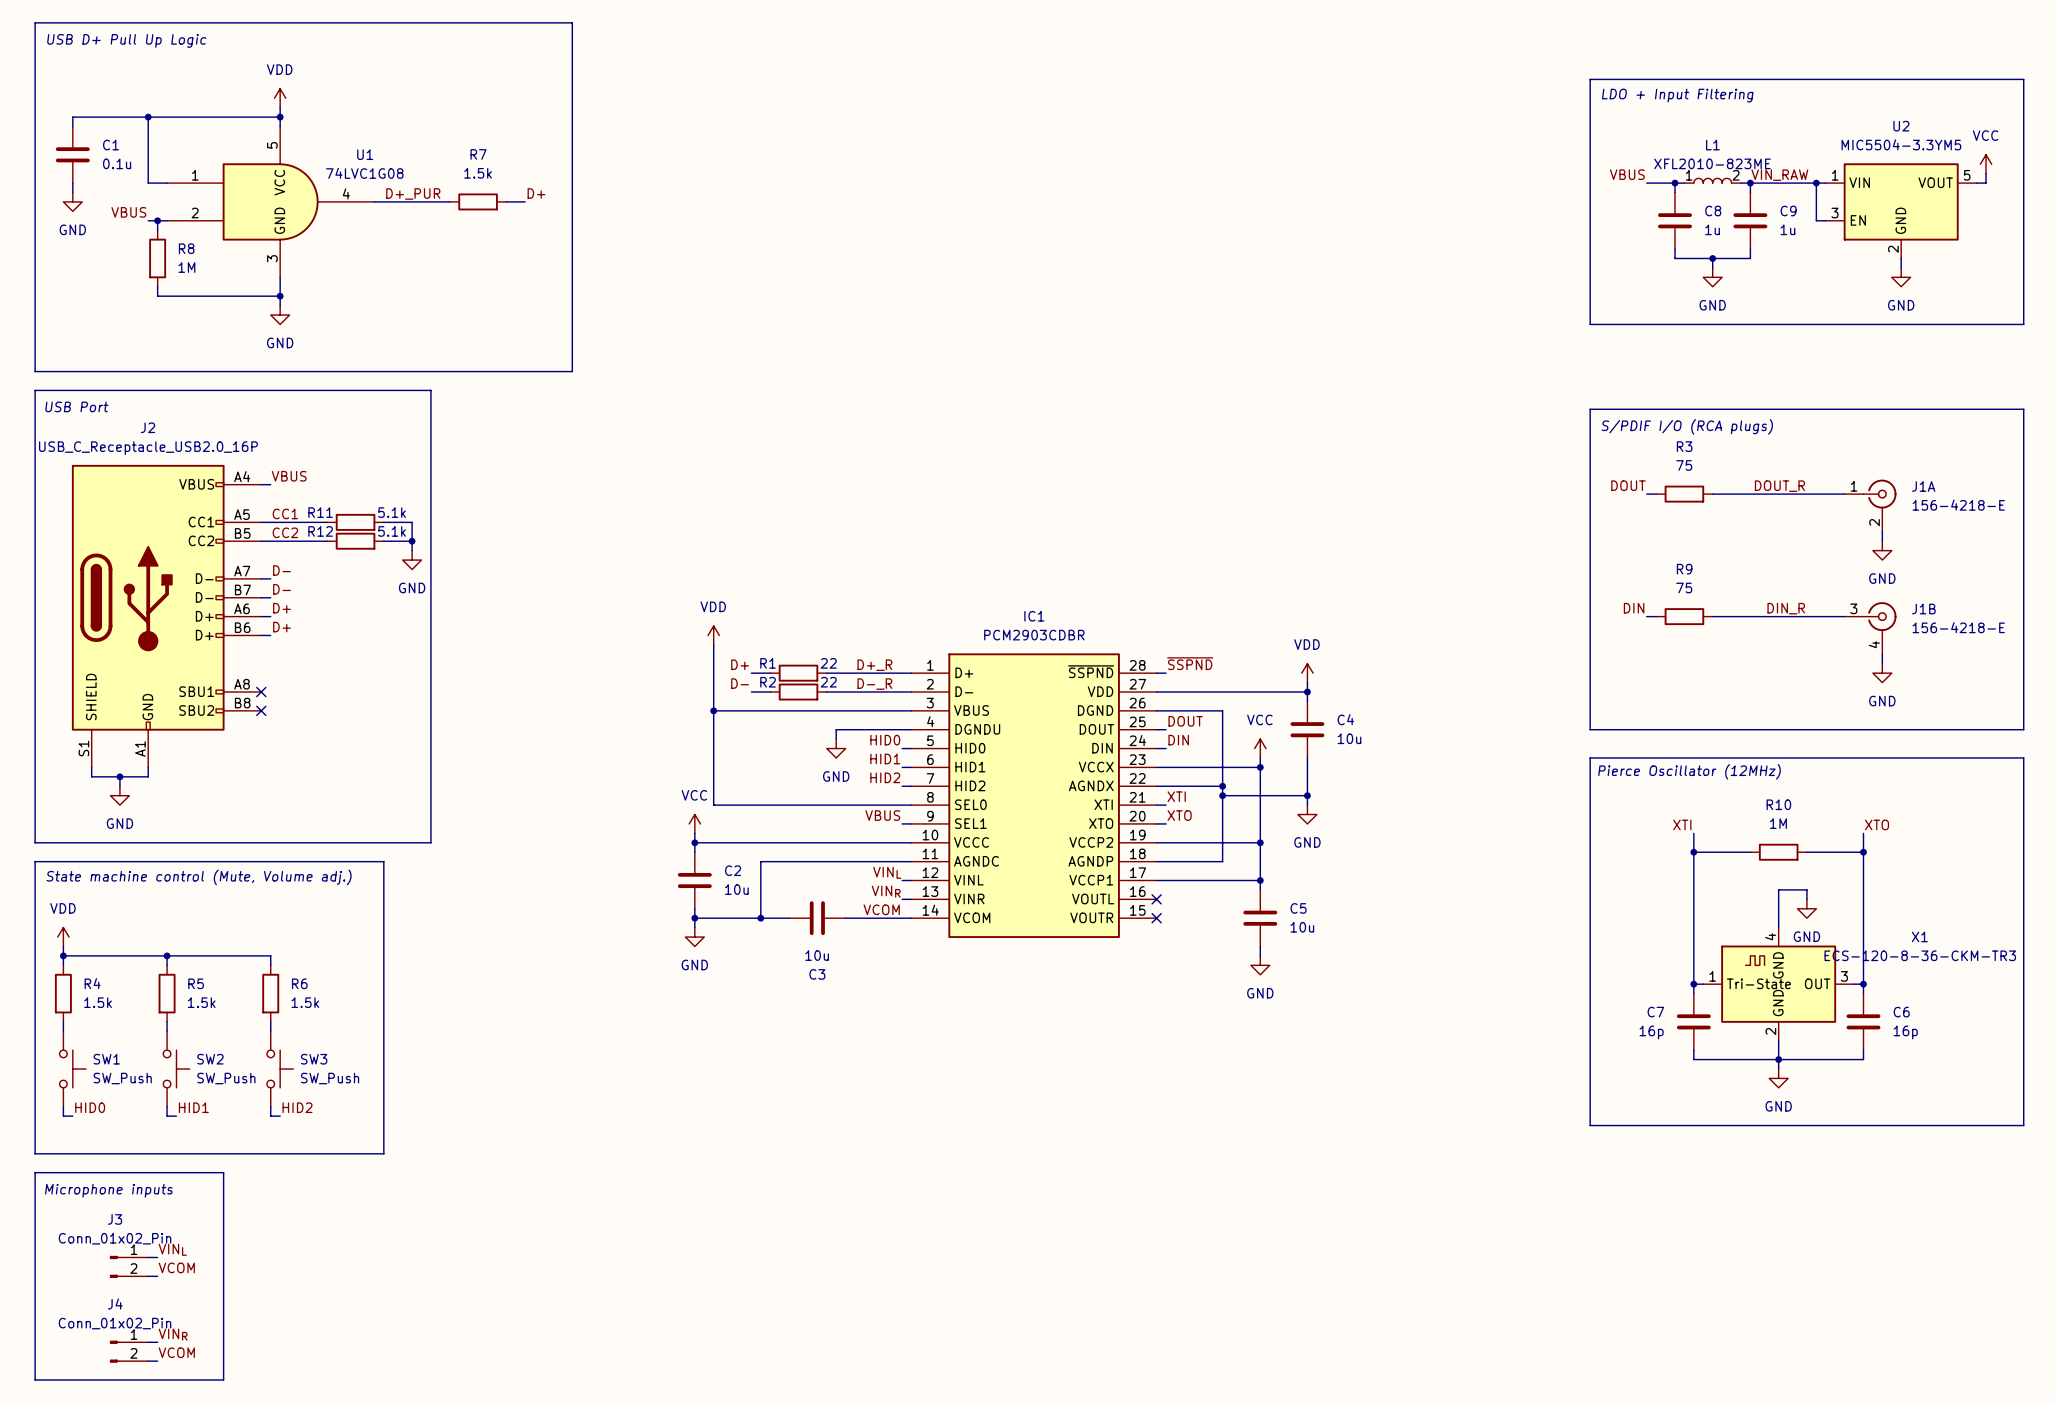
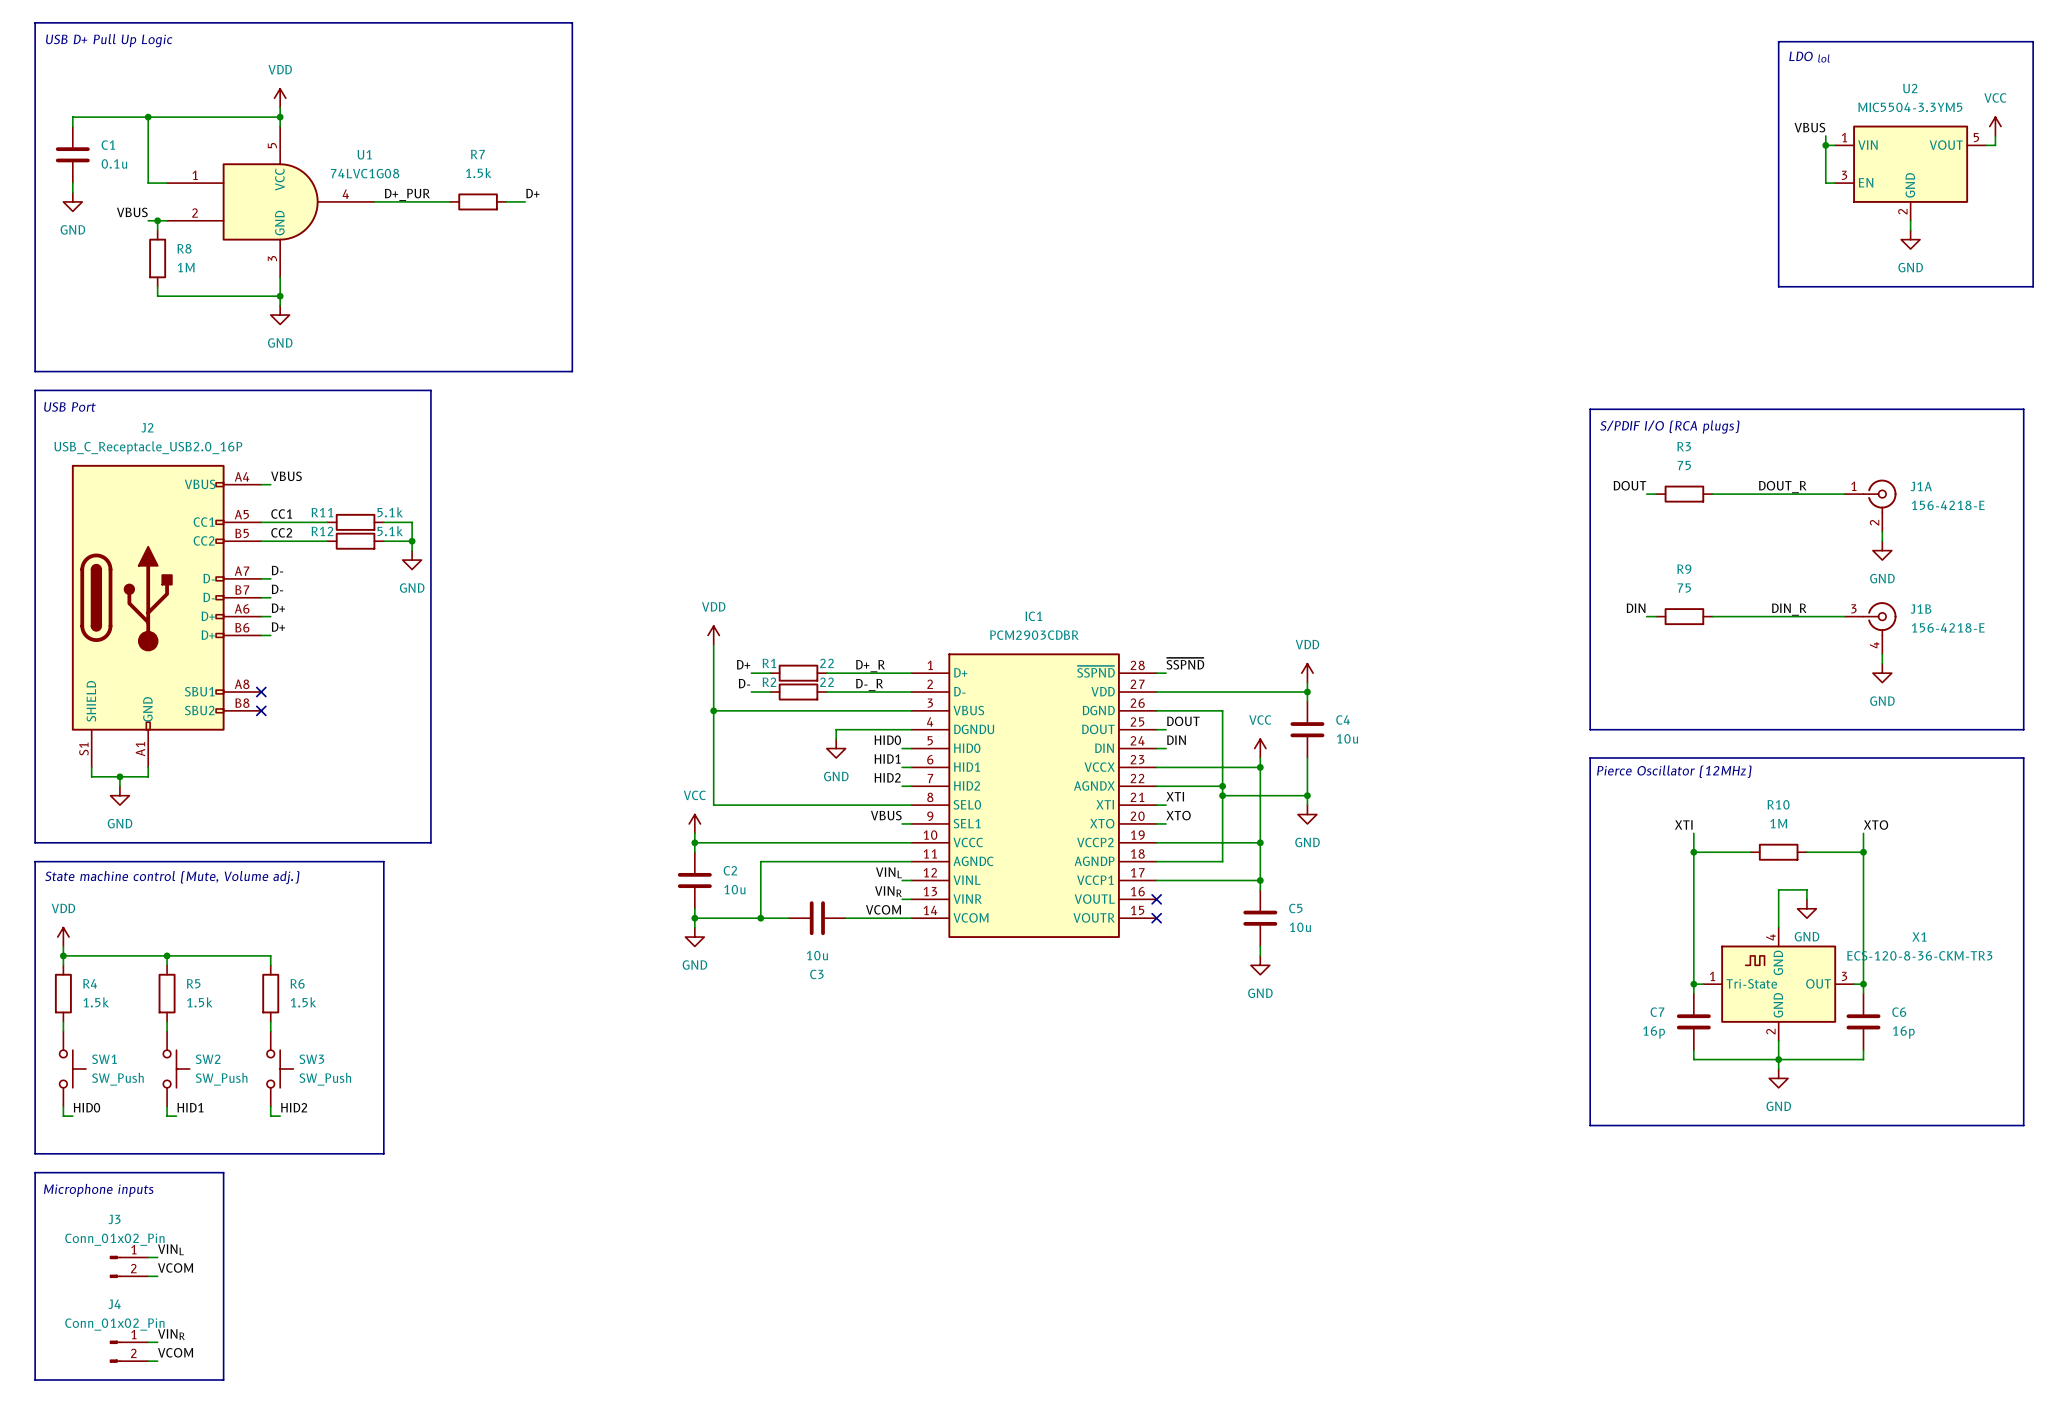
line: none -> (1778, 41) (2033, 41) (2033, 286) (1778, 286) (1778, 41)
text: none -> LDO lol (1809, 57)
line: (1590, 79) (2023, 79) (2023, 324) (1590, 324) (1590, 79) -> none
text: LDO + Input Filtering (1677, 95) -> none
wire: none -> (1825, 135) (1825, 183) (1835, 183)
wire: none -> (1825, 145) (1835, 145)
power symbol position: VCC (1986, 164) -> VCC (1995, 126)
wire: (1986, 173) (1986, 183) (1976, 183) -> (1995, 135) (1995, 145) (1986, 145)
label position: VBUS (1627, 174) -> VBUS (1809, 127)
label: VIN_RAW (1779, 175) -> none
L1: XFL2010-823ME (1712, 180) -> none
wire: (1646, 183) (1684, 183) -> none
wire: (1674, 183) (1674, 192) -> none
junction: (1674, 183) -> none
wire: (1740, 183) (1825, 183) -> none
wire: (1750, 183) (1750, 192) -> none
junction: (1750, 183) -> none
wire: (1816, 183) (1816, 220) (1825, 220) -> none
junction position: (1816, 183) -> (1825, 145)
U2 position: (1901, 210) -> (1910, 173)
C8: 1u (1674, 220) -> none
C9: 1u (1750, 220) -> none
wire: (1674, 249) (1674, 258) (1750, 258) (1750, 249) -> none
wire: (1712, 258) (1712, 267) -> none
junction: (1712, 258) -> none
power symbol: GND (1712, 277) -> none
power symbol position: GND (1901, 277) -> GND (1910, 239)

